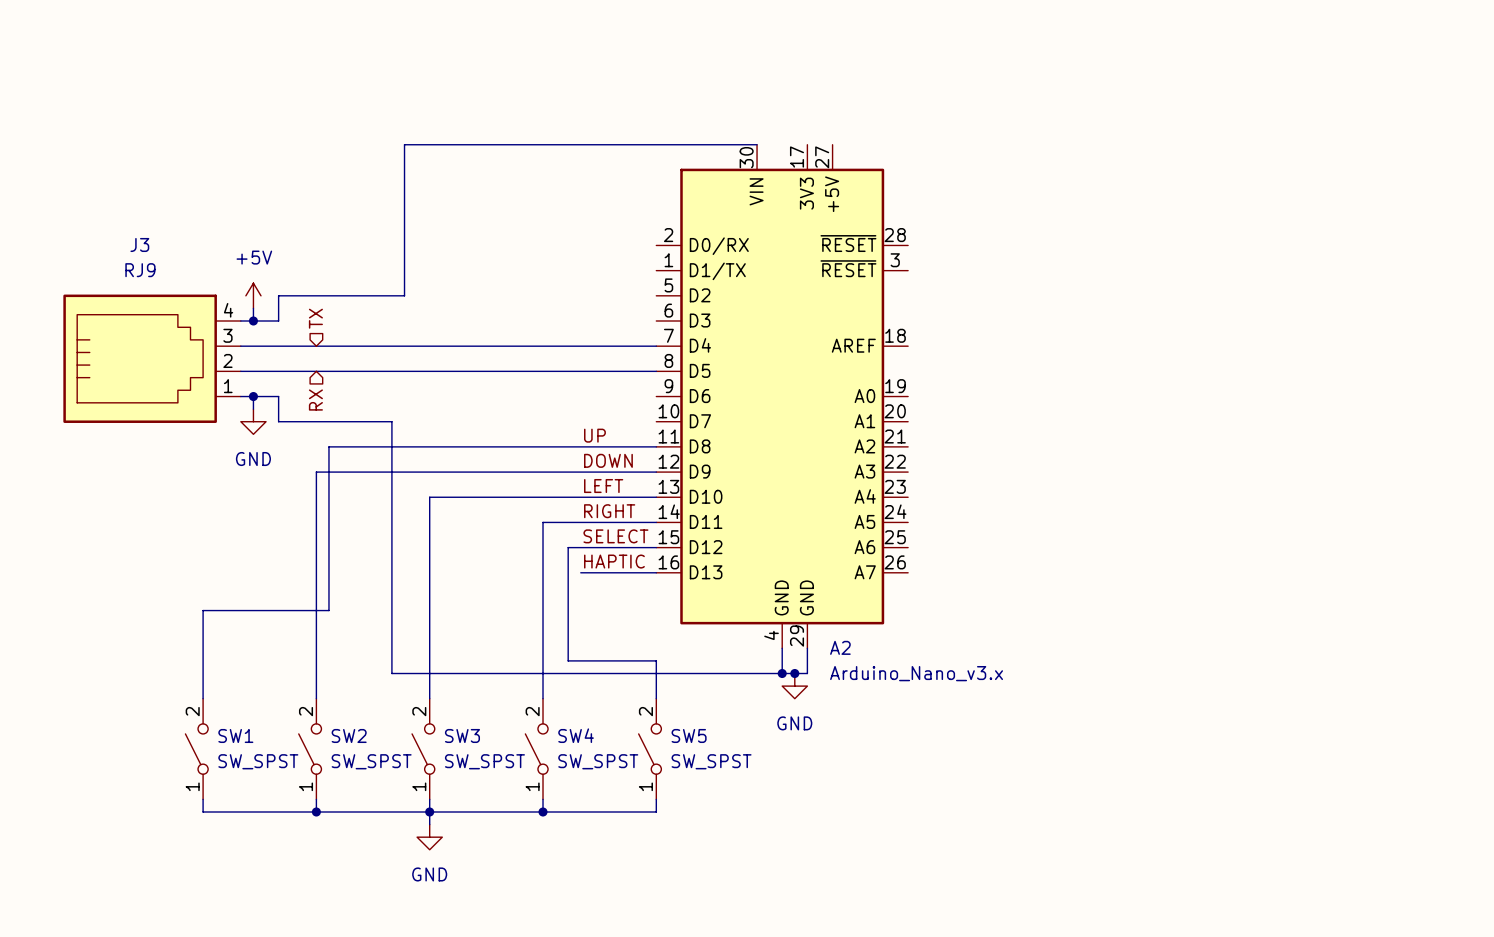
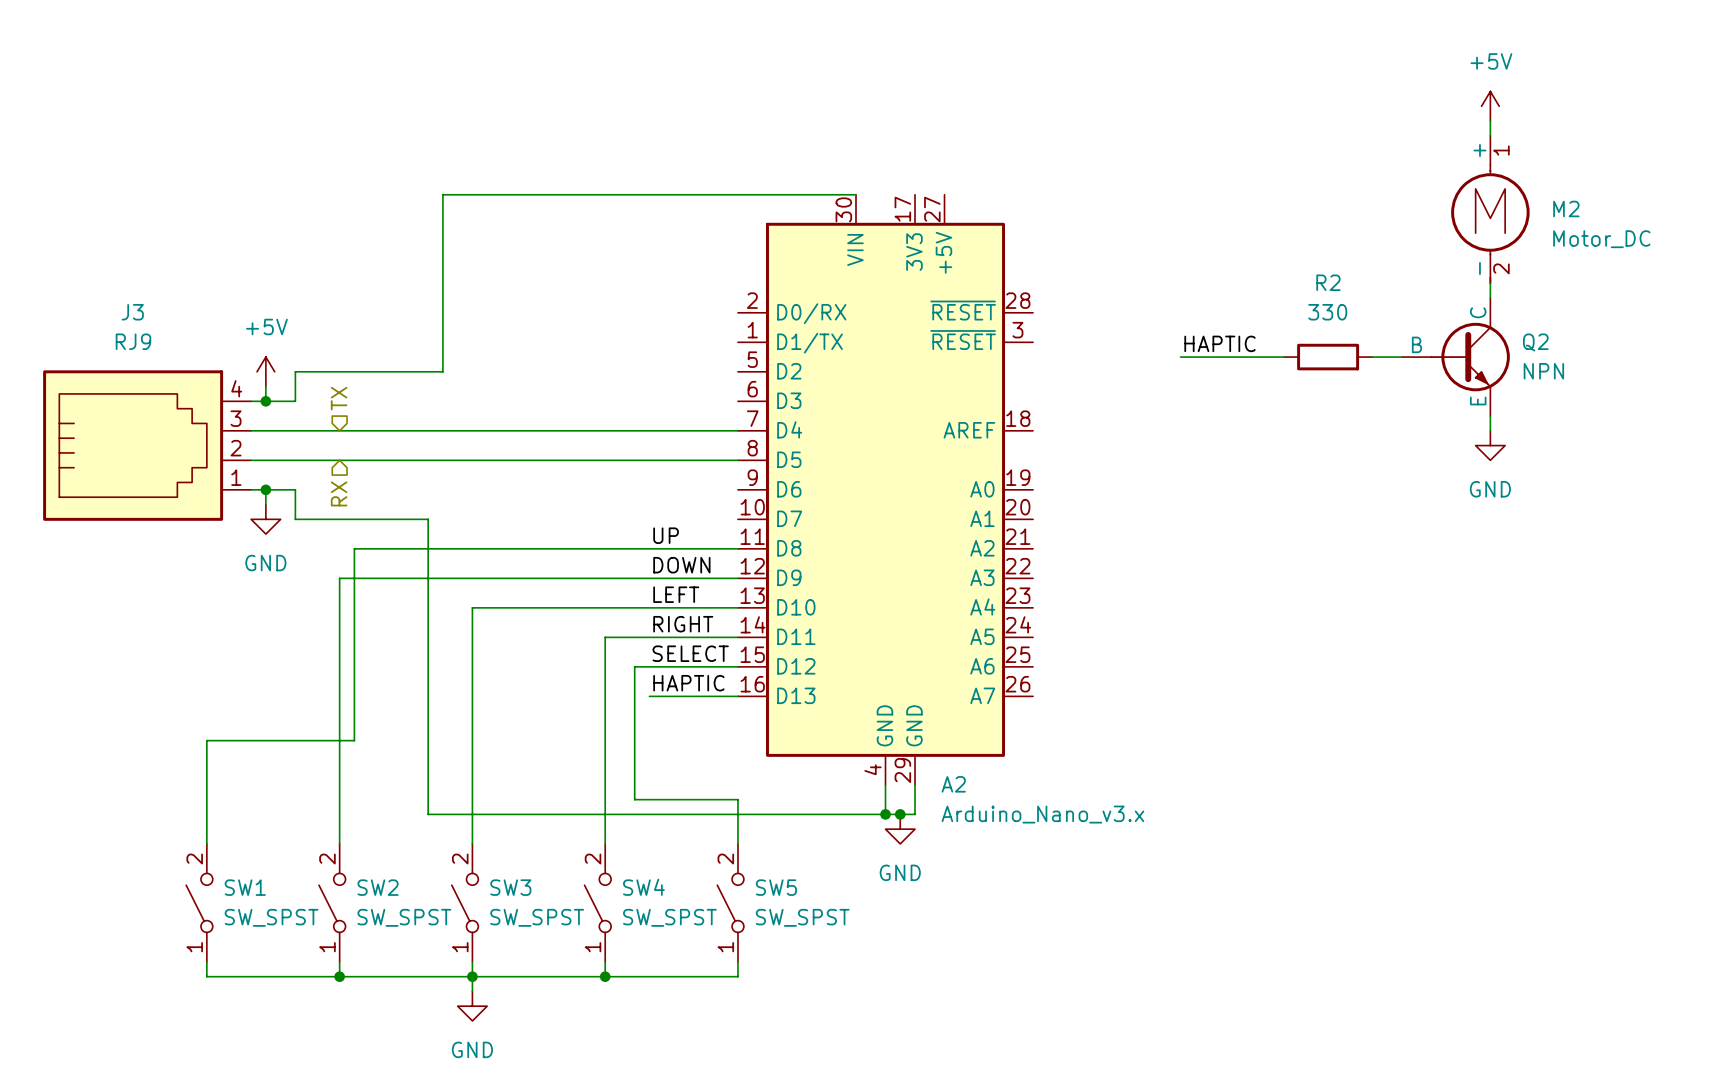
power symbol: none -> +5V (1490, 106)
wire: none -> (1490, 121) (1490, 135)
M2: none -> Motor_DC (1490, 209)
wire: none -> (1490, 283) (1490, 298)
label: none -> HAPTIC (1220, 343)
wire: none -> (1180, 357) (1283, 357)
R2: none -> 330 (1328, 357)
wire: none -> (1372, 357) (1401, 357)
Q2: none -> NPN (1455, 357)
wire: none -> (1490, 416) (1490, 430)
power symbol: none -> GND (1490, 445)

